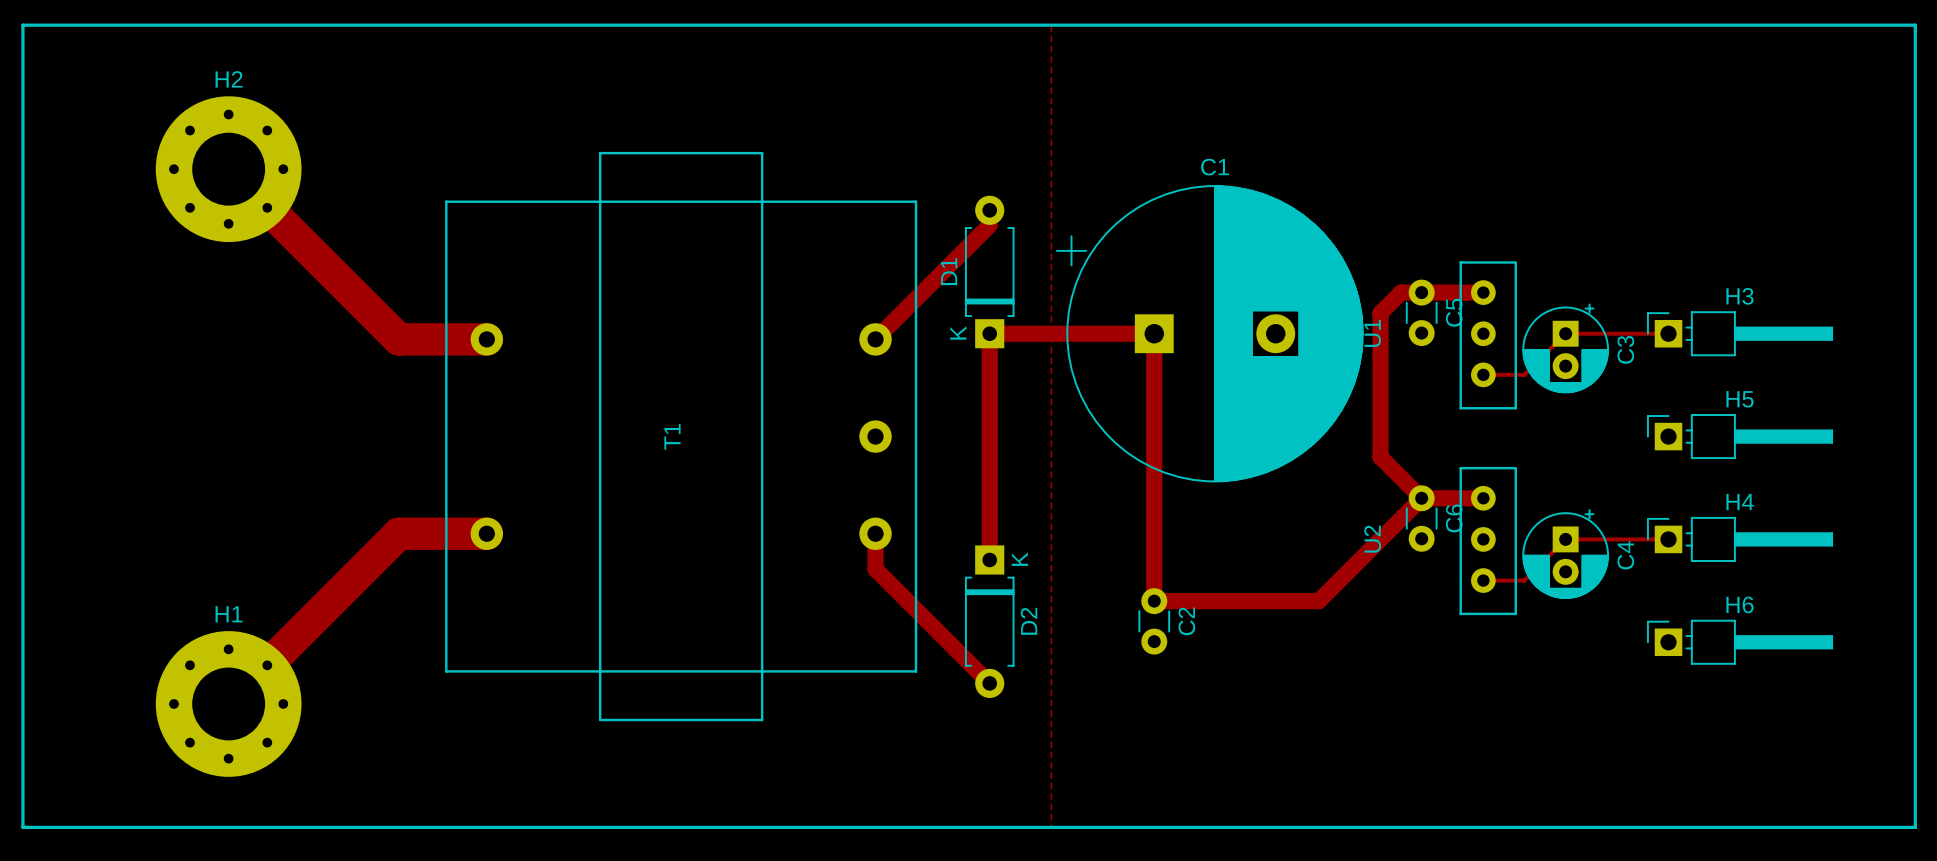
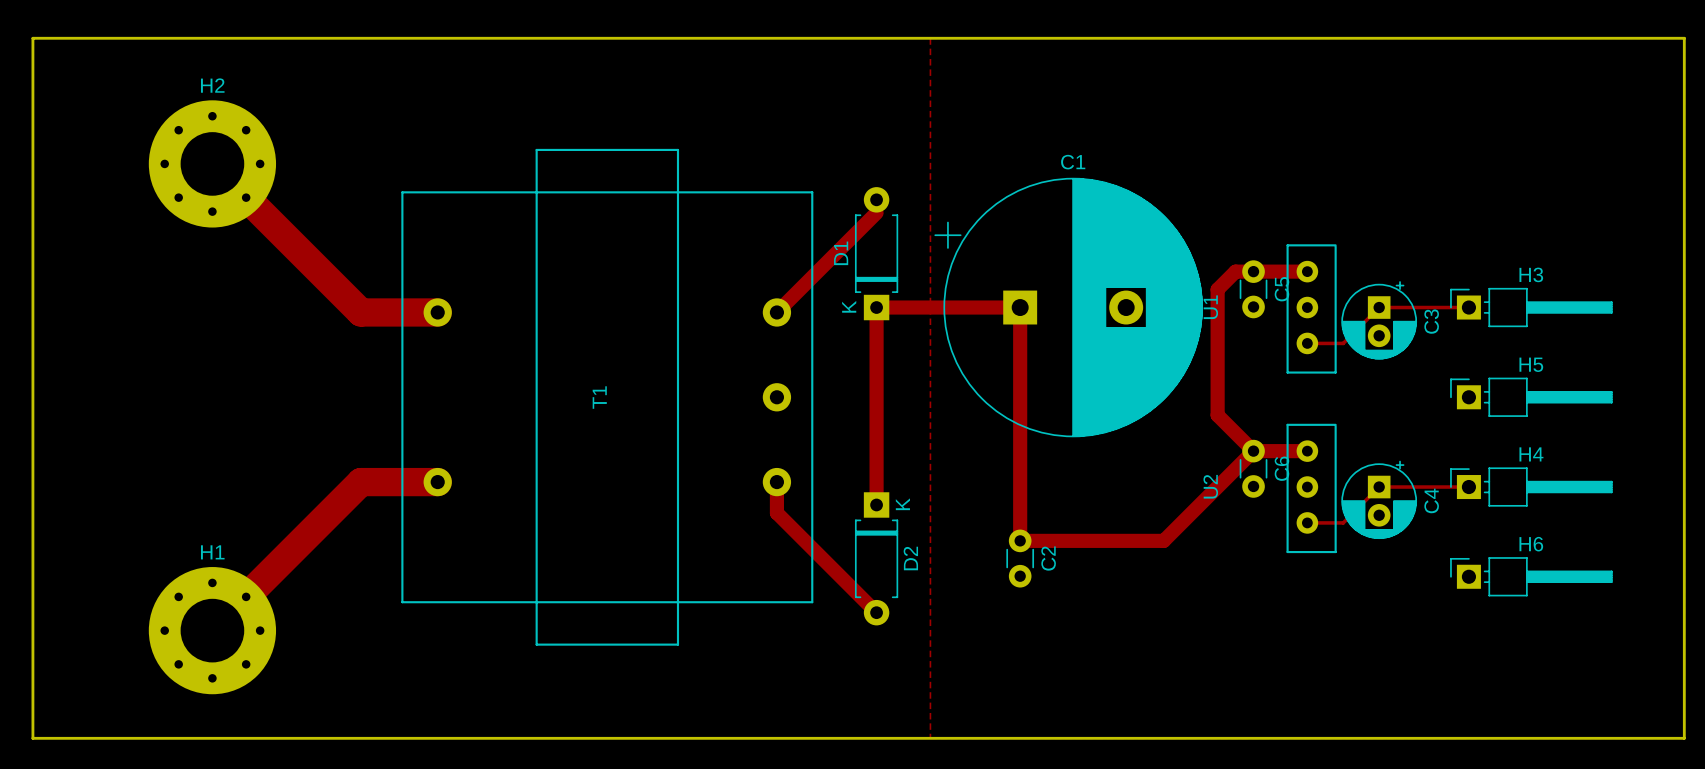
line: (22, 25) (1915, 25) (1915, 827) (22, 827) (22, 25) -> none
board edge: none -> (32, 38) (1684, 38) (1684, 738) (32, 738) (32, 38)

